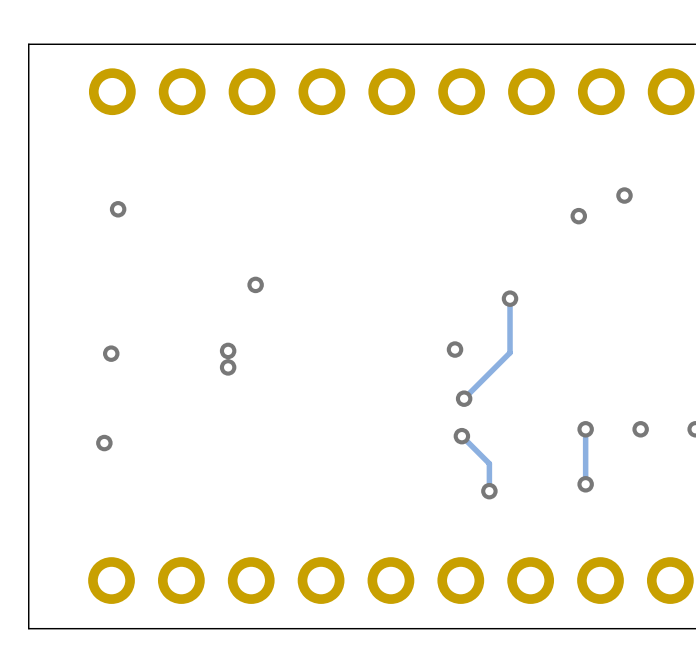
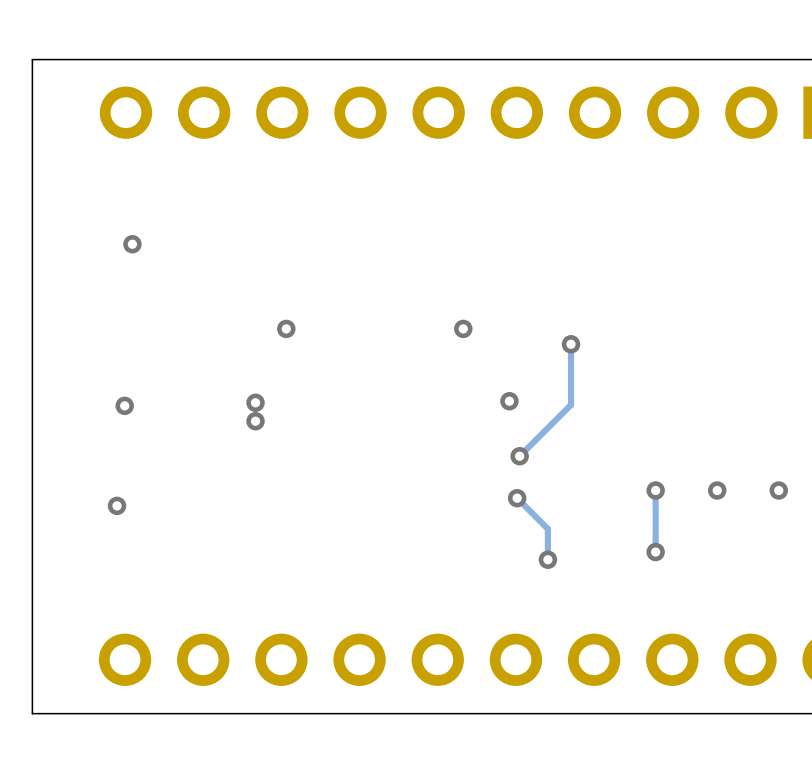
via: (624, 195) -> none
via: (578, 216) -> none
via: none -> (463, 328)

